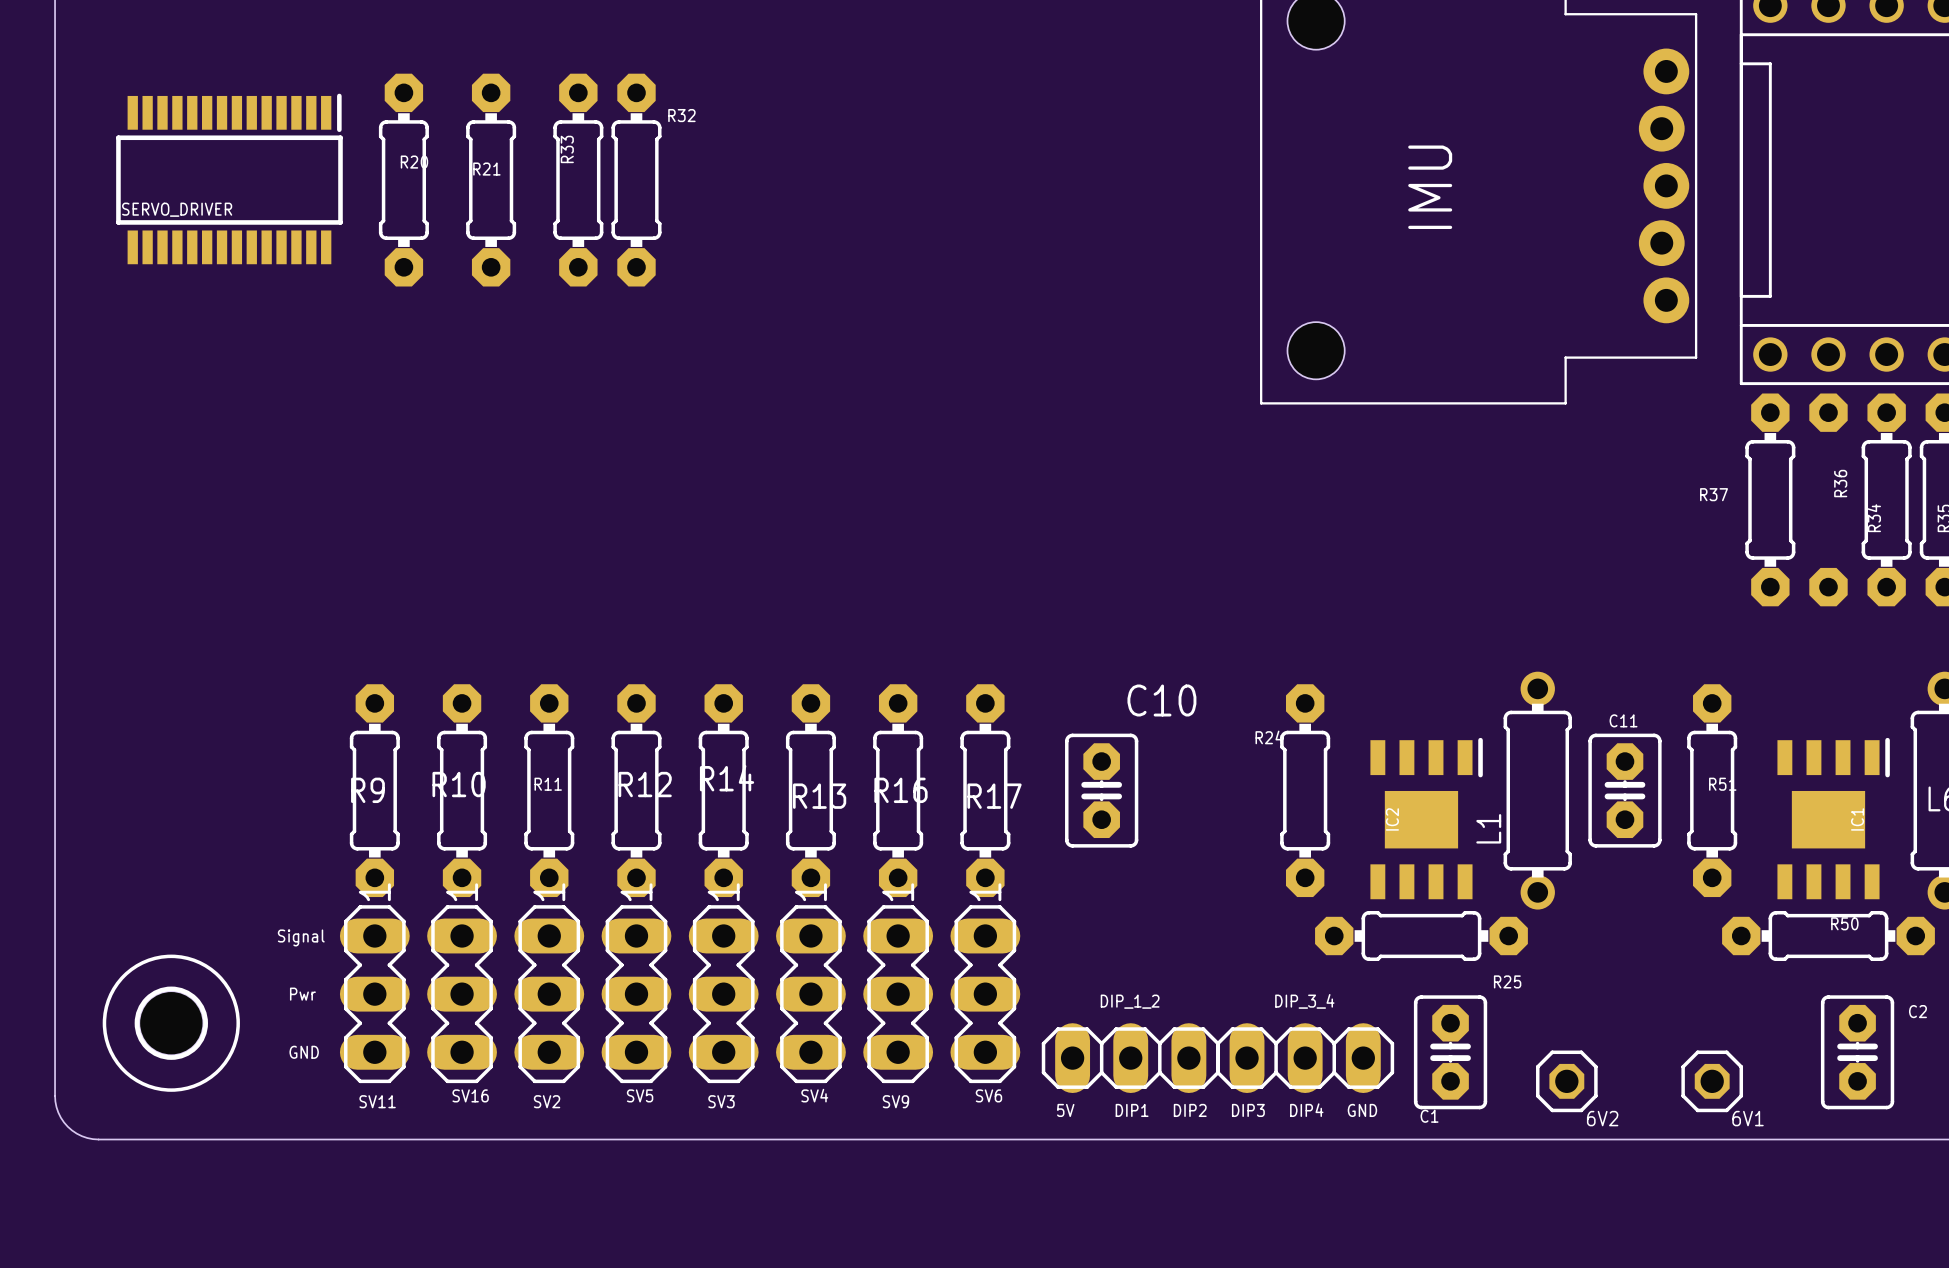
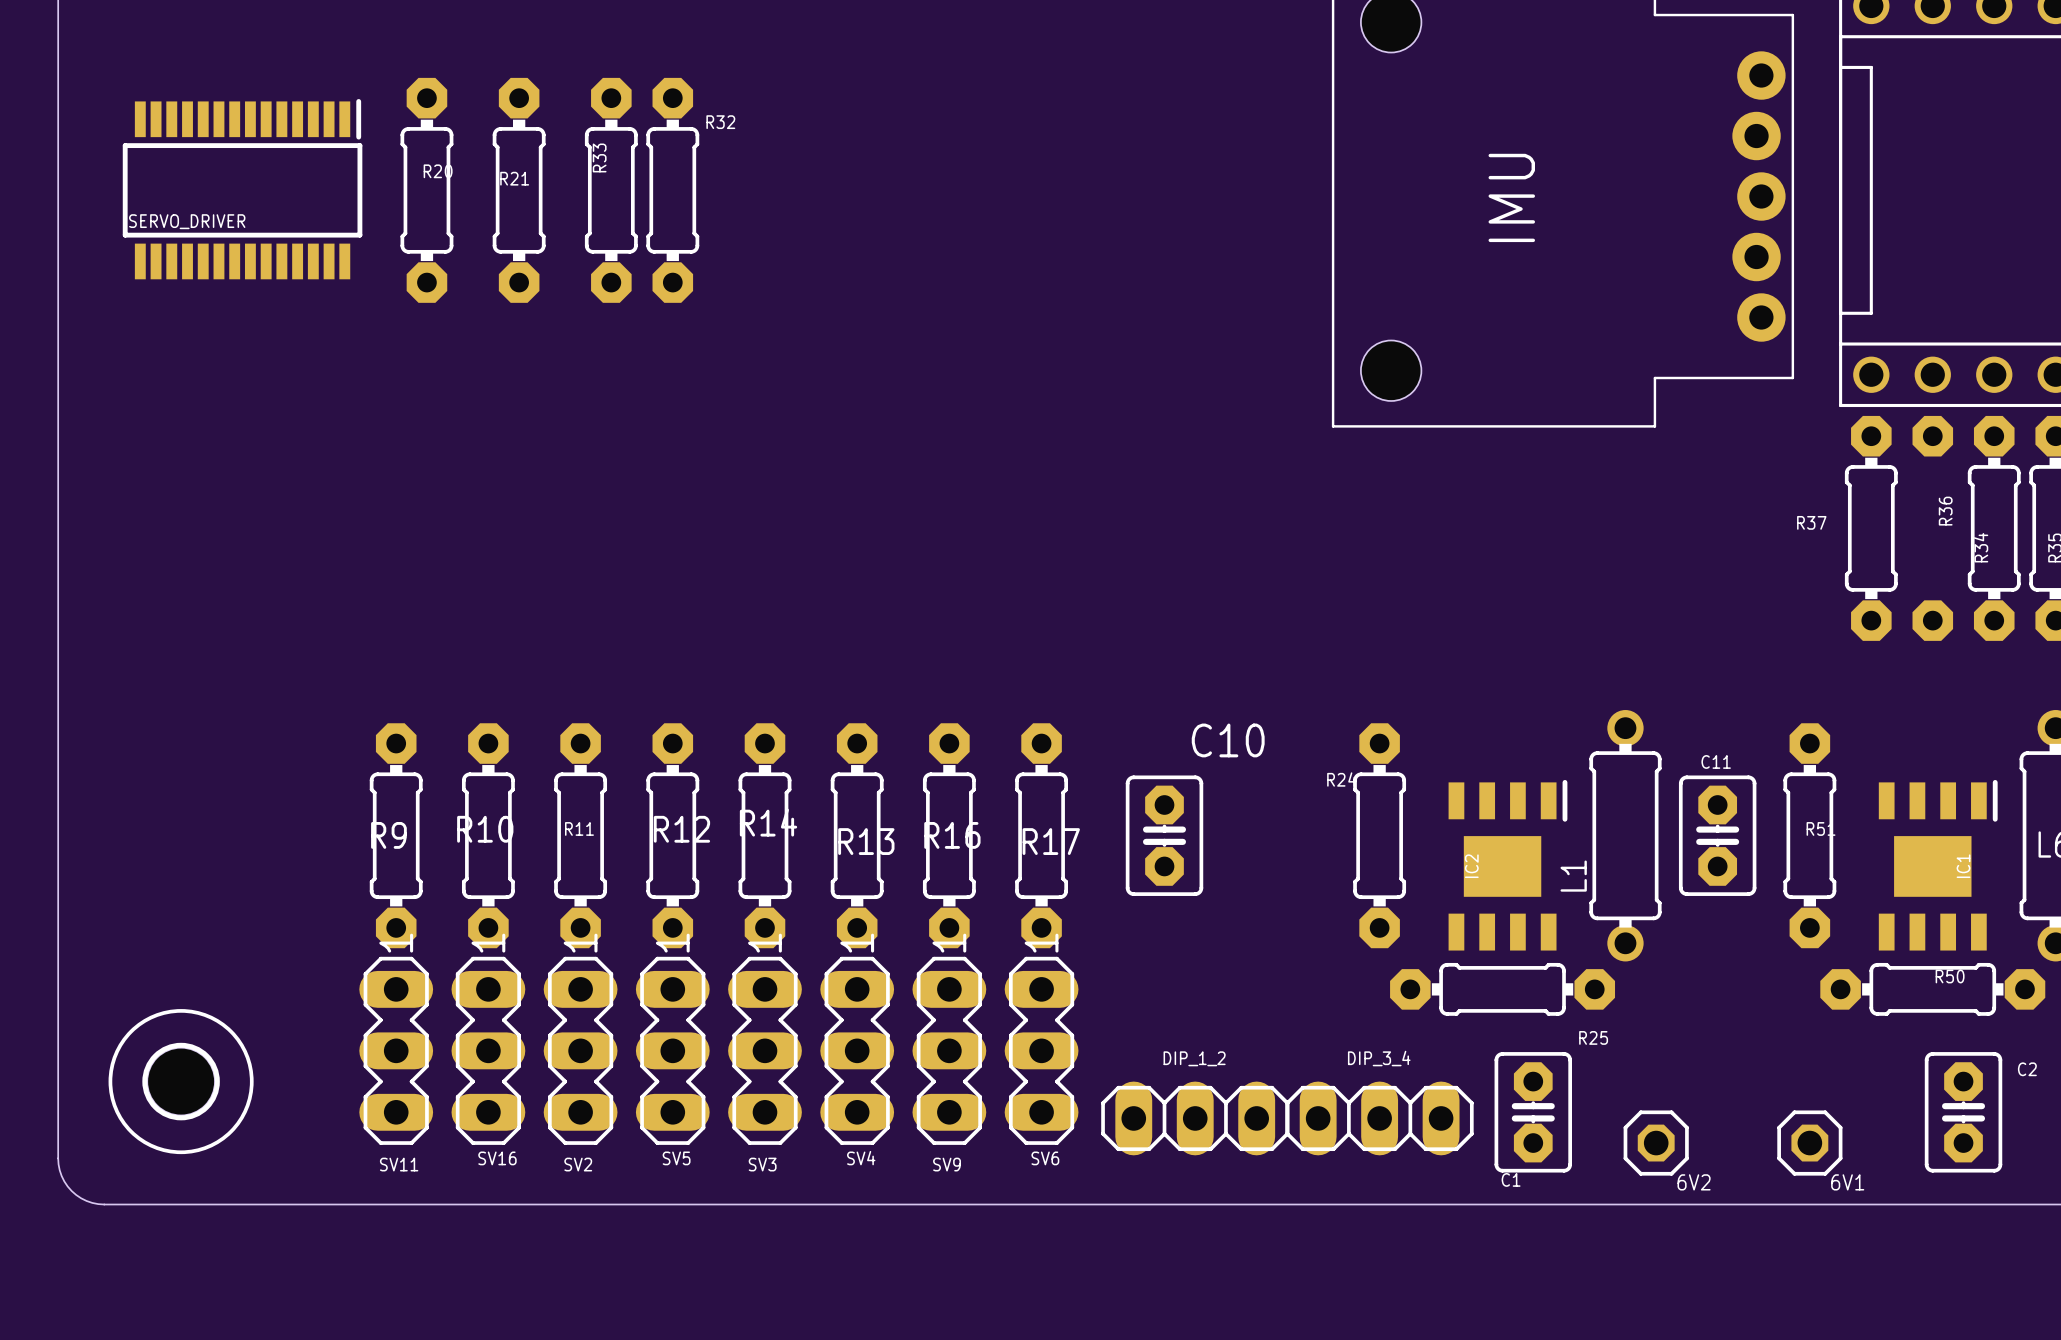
text: Signal (301, 937) -> none
text: Pwr (302, 994) -> none
text: GND (304, 1052) -> none
text: 5V (1065, 1110) -> none
text: DIP1 (1132, 1110) -> none
text: DIP2 (1190, 1110) -> none
text: DIP3 (1248, 1110) -> none
text: DIP4 (1306, 1110) -> none
text: GND (1362, 1110) -> none

